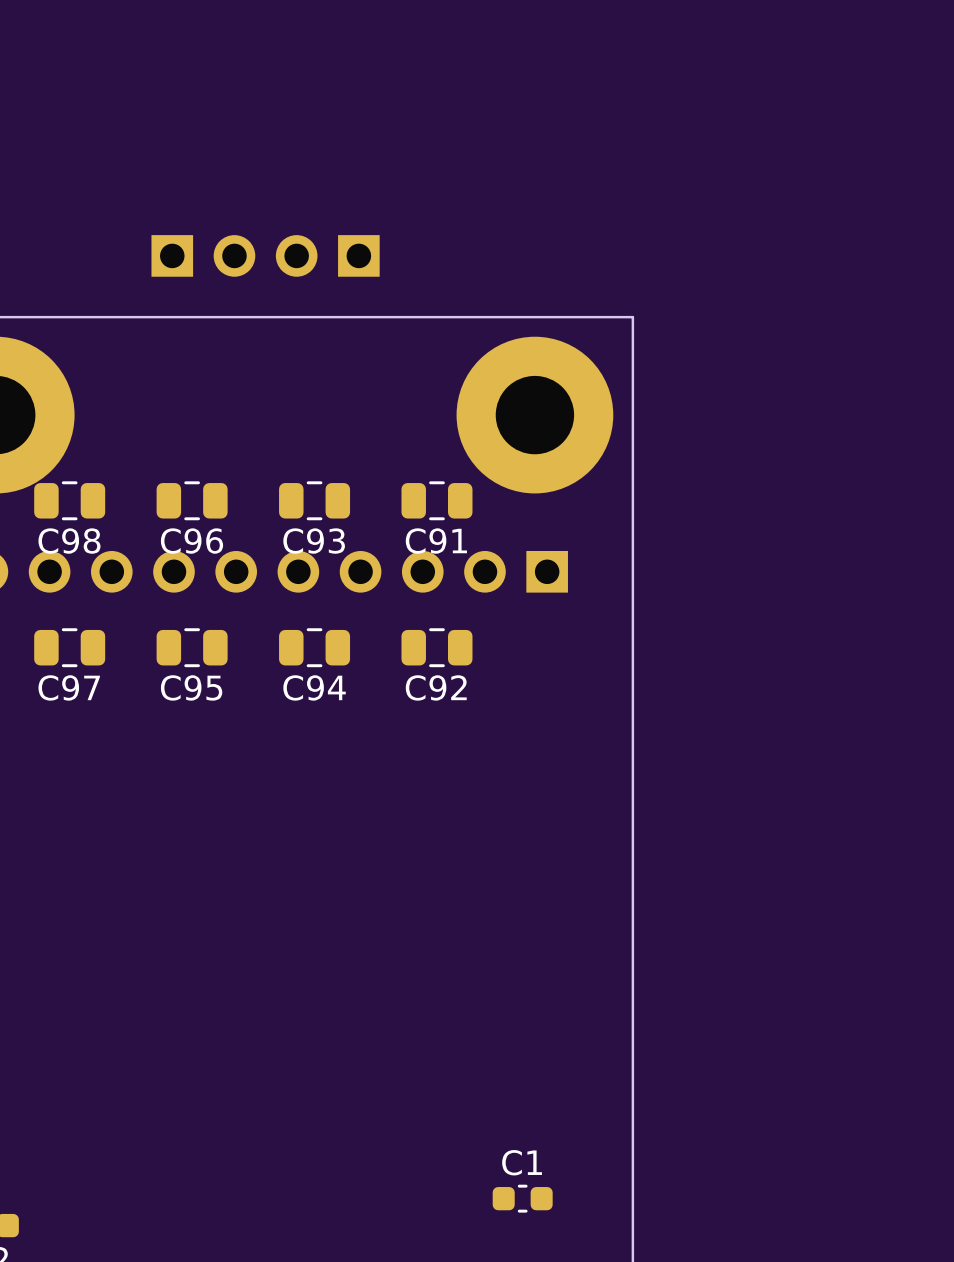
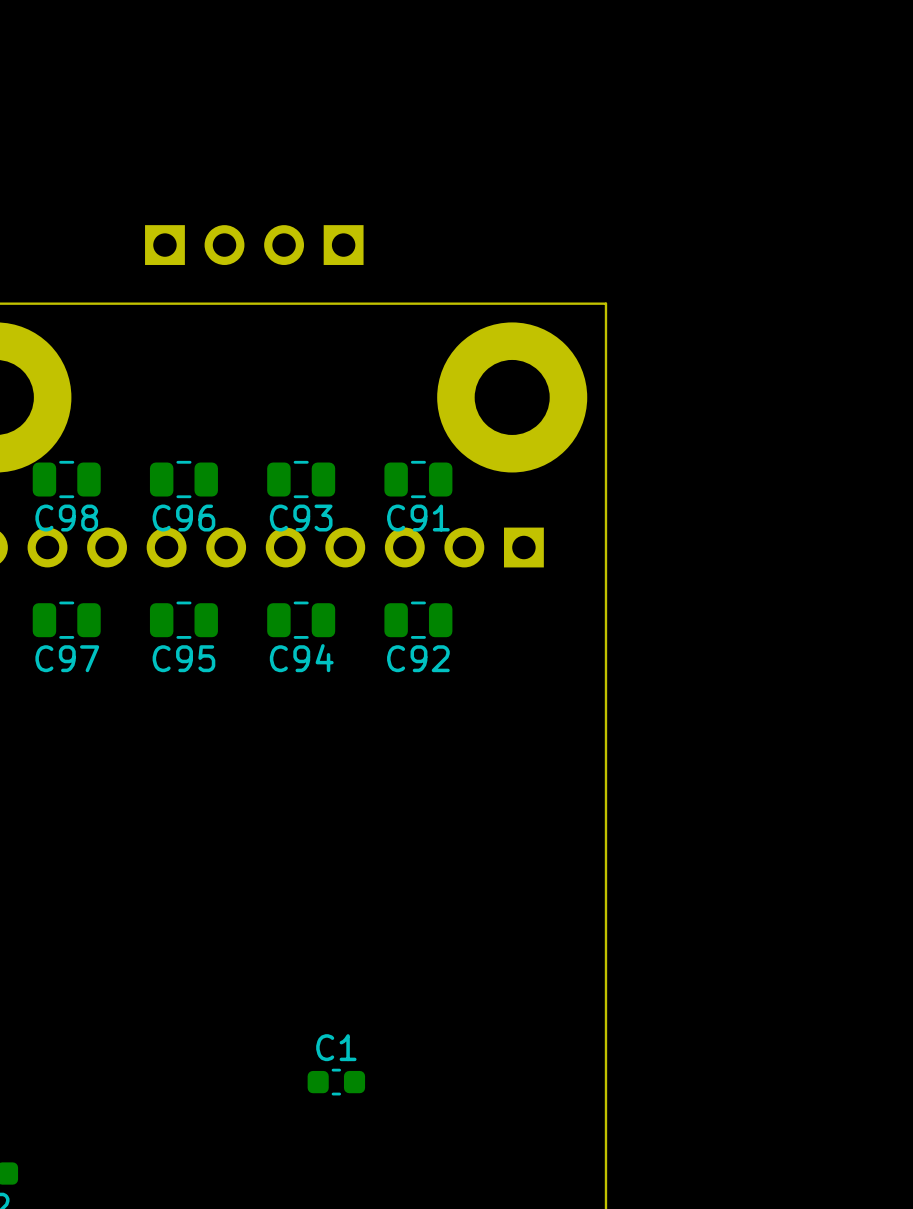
C1 position: (522, 1198) -> (336, 1082)

